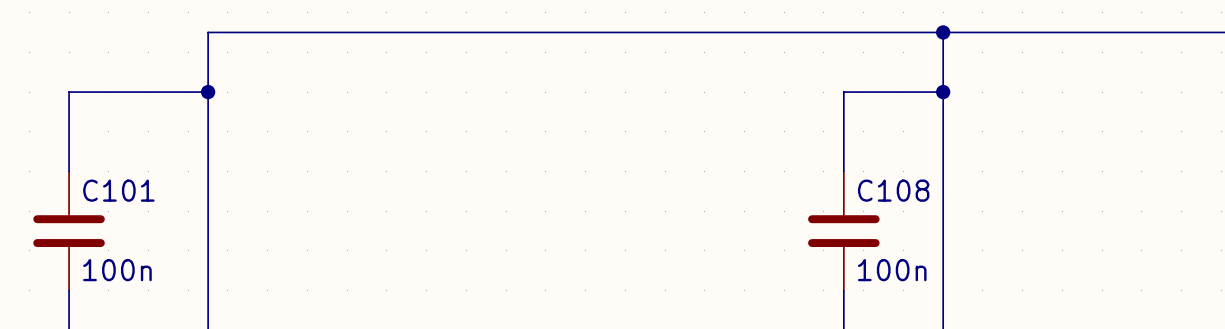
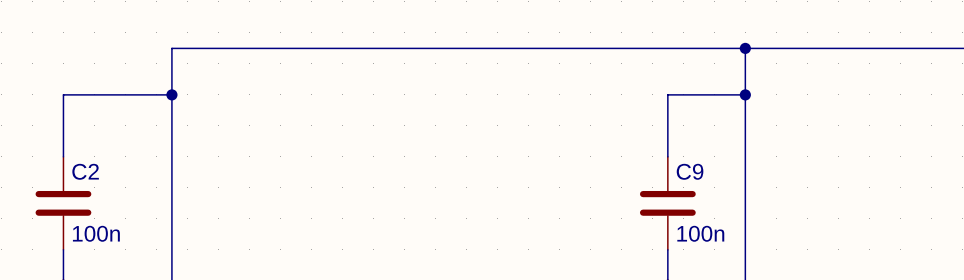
C101 name: C101 (118, 190) -> C2 (85, 171)
C108 name: C108 (893, 190) -> C9 (690, 171)

